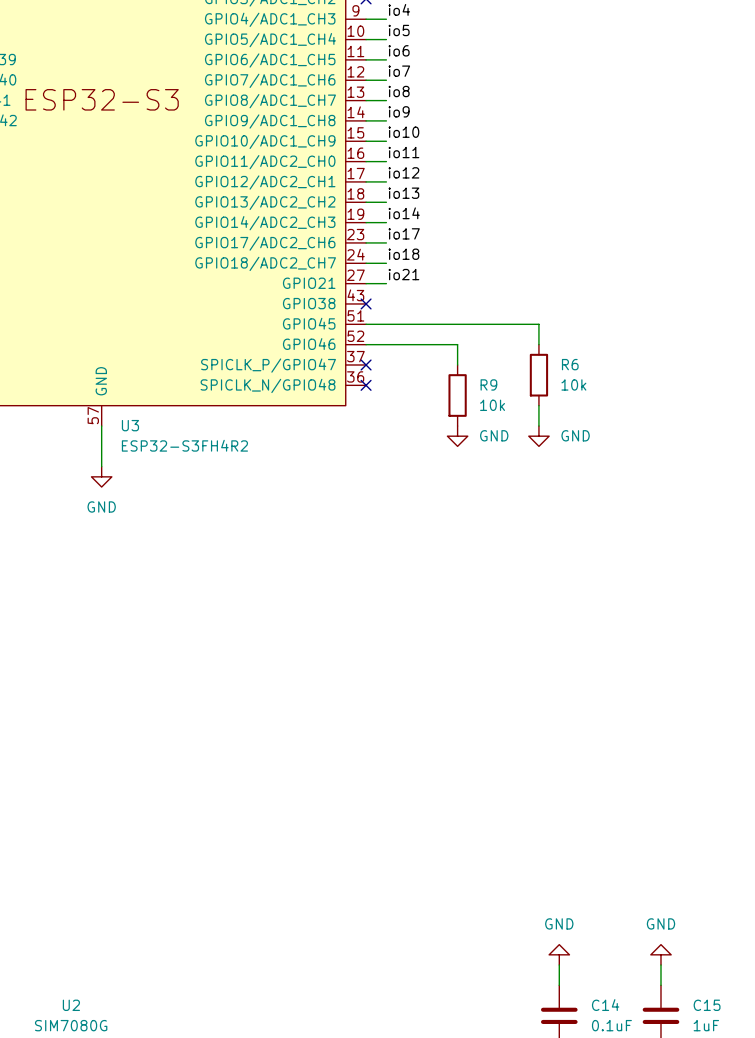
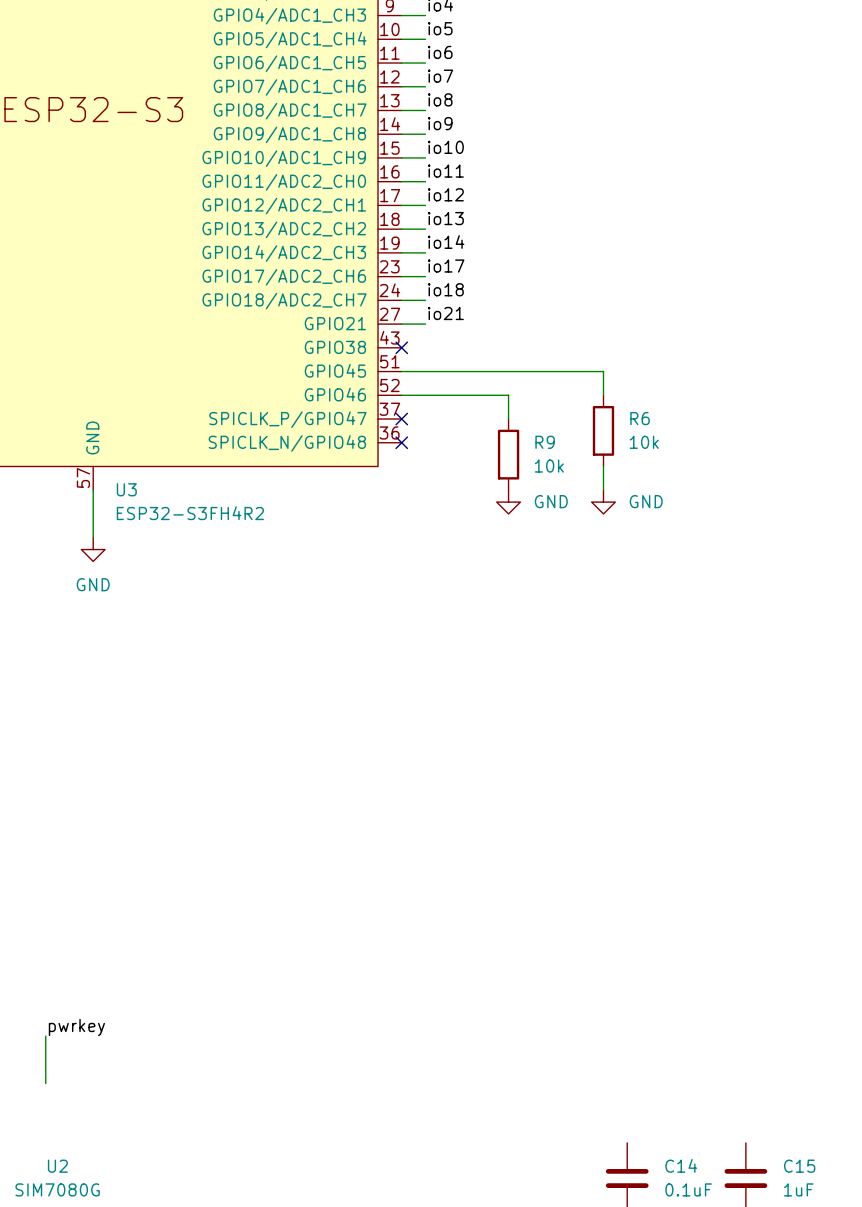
label: none -> pwrkey (76, 1027)
wire: none -> (45, 1036) (45, 1083)
power symbol: GND (559, 954) -> none
power symbol: GND (660, 954) -> none
wire: (559, 965) (559, 985) -> none
wire: (660, 965) (660, 985) -> none

